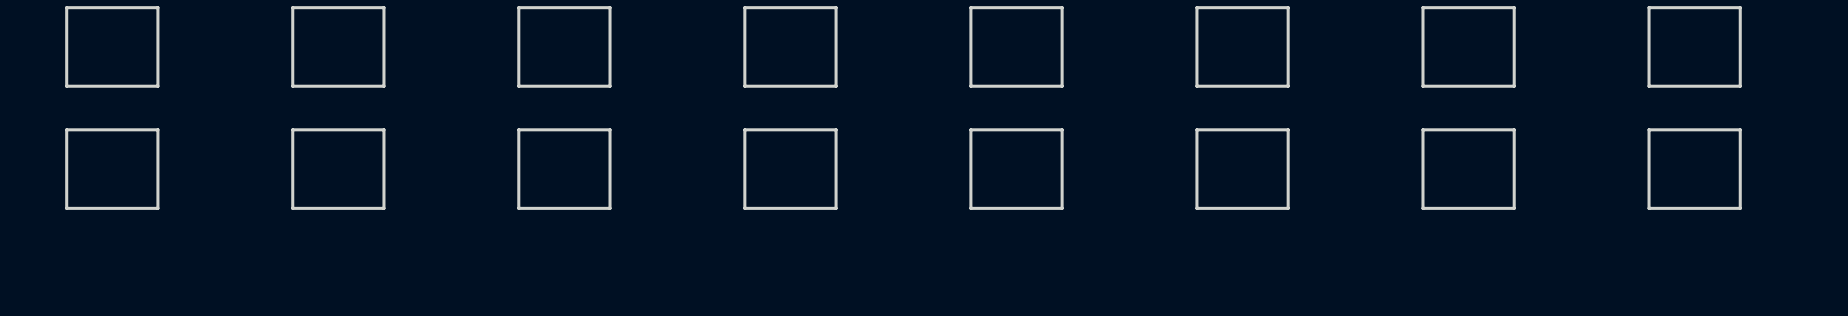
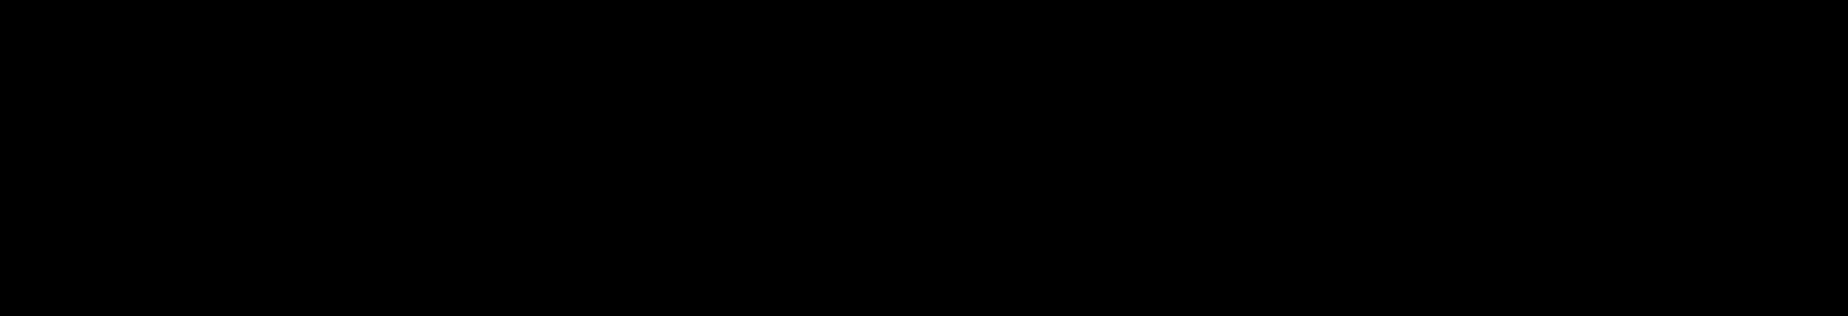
part: (112, 46) -> none
part: (338, 46) -> none
part: (564, 46) -> none
part: (790, 46) -> none
part: (1016, 46) -> none
part: (1242, 46) -> none
part: (1468, 46) -> none
part: (1694, 46) -> none
part: (112, 169) -> none
part: (338, 169) -> none
part: (564, 169) -> none
part: (790, 169) -> none
part: (1016, 169) -> none
part: (1242, 169) -> none
part: (1468, 169) -> none
part: (1694, 169) -> none

